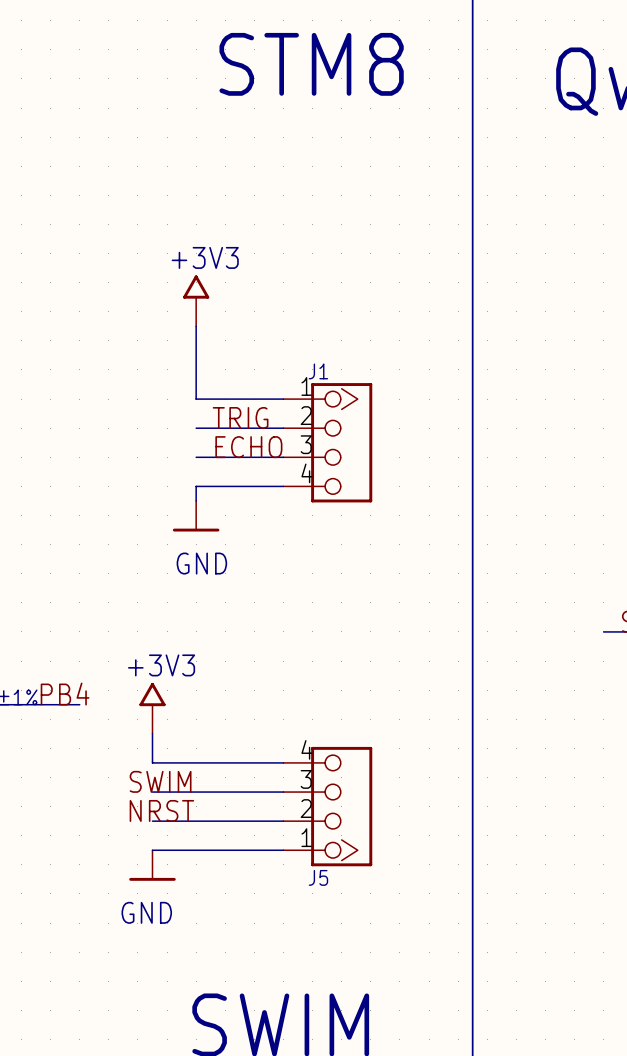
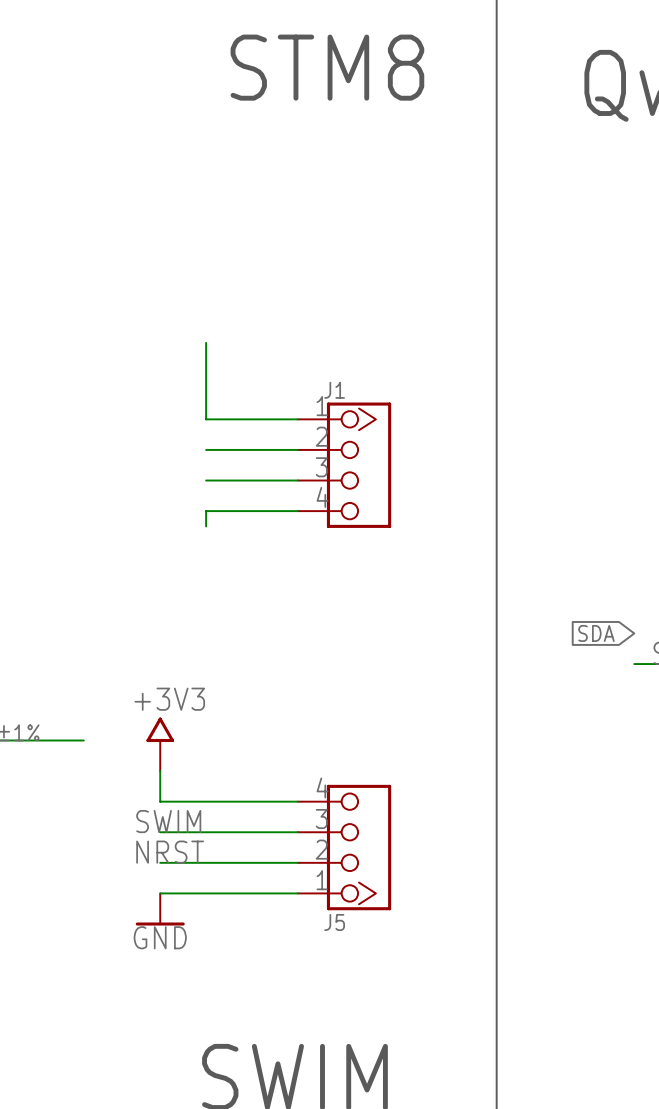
power symbol: +3V3 (196, 300) -> none
label: TRIG (240, 418) -> none
label: ECHO (248, 447) -> none
power symbol: GND (196, 516) -> none
global label: none -> SDA (596, 633)
label: PB4 (65, 694) -> none
power symbol text position: GND (146, 912) -> GND (160, 937)

